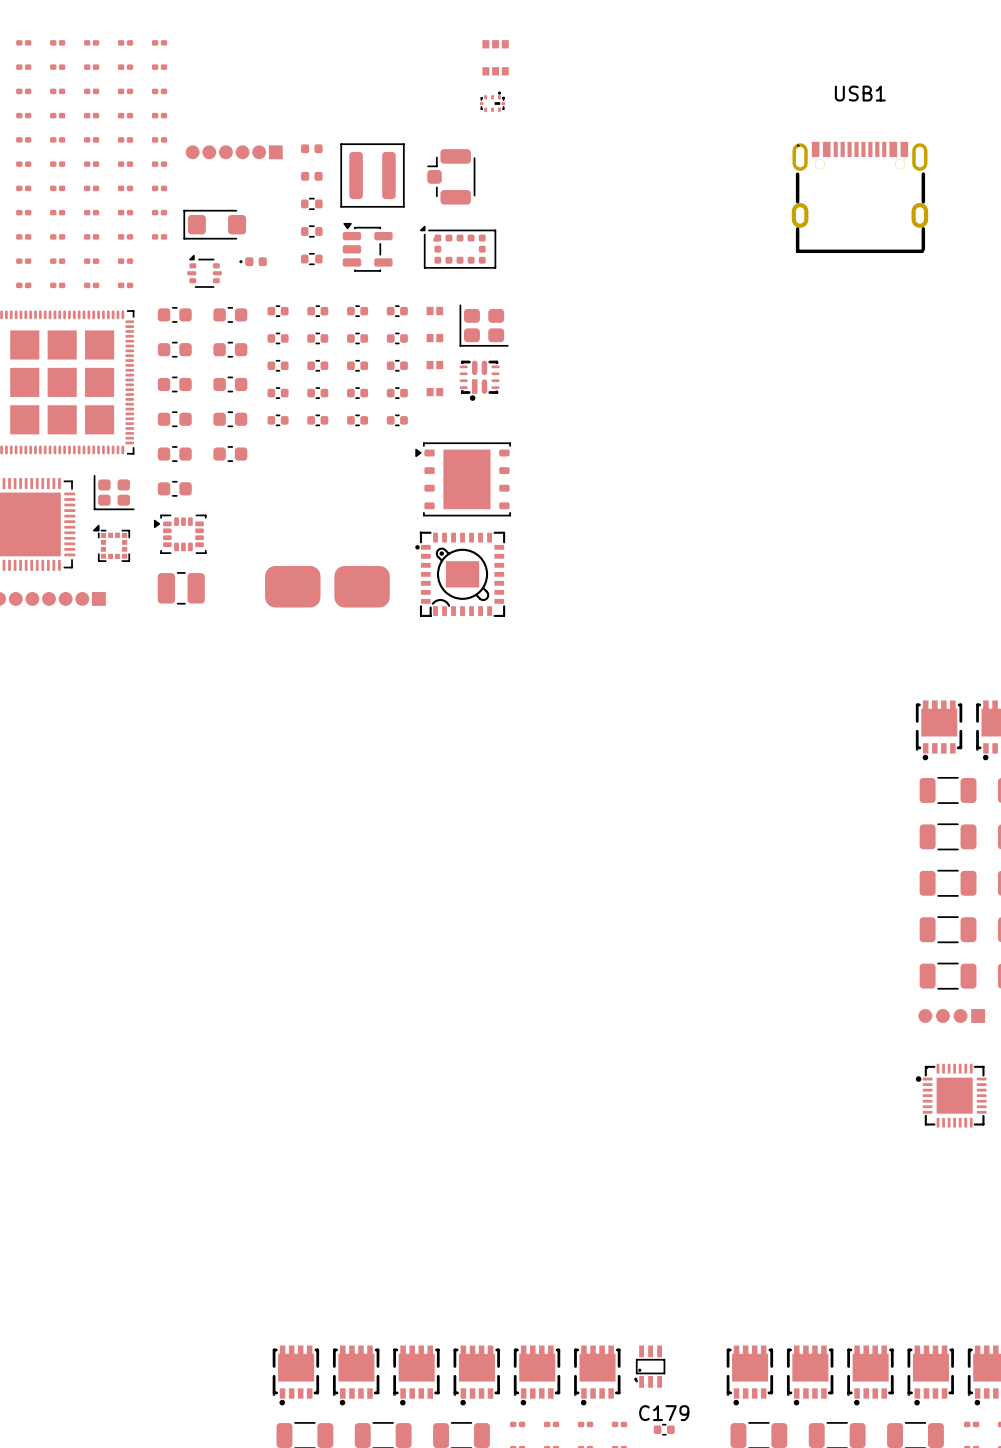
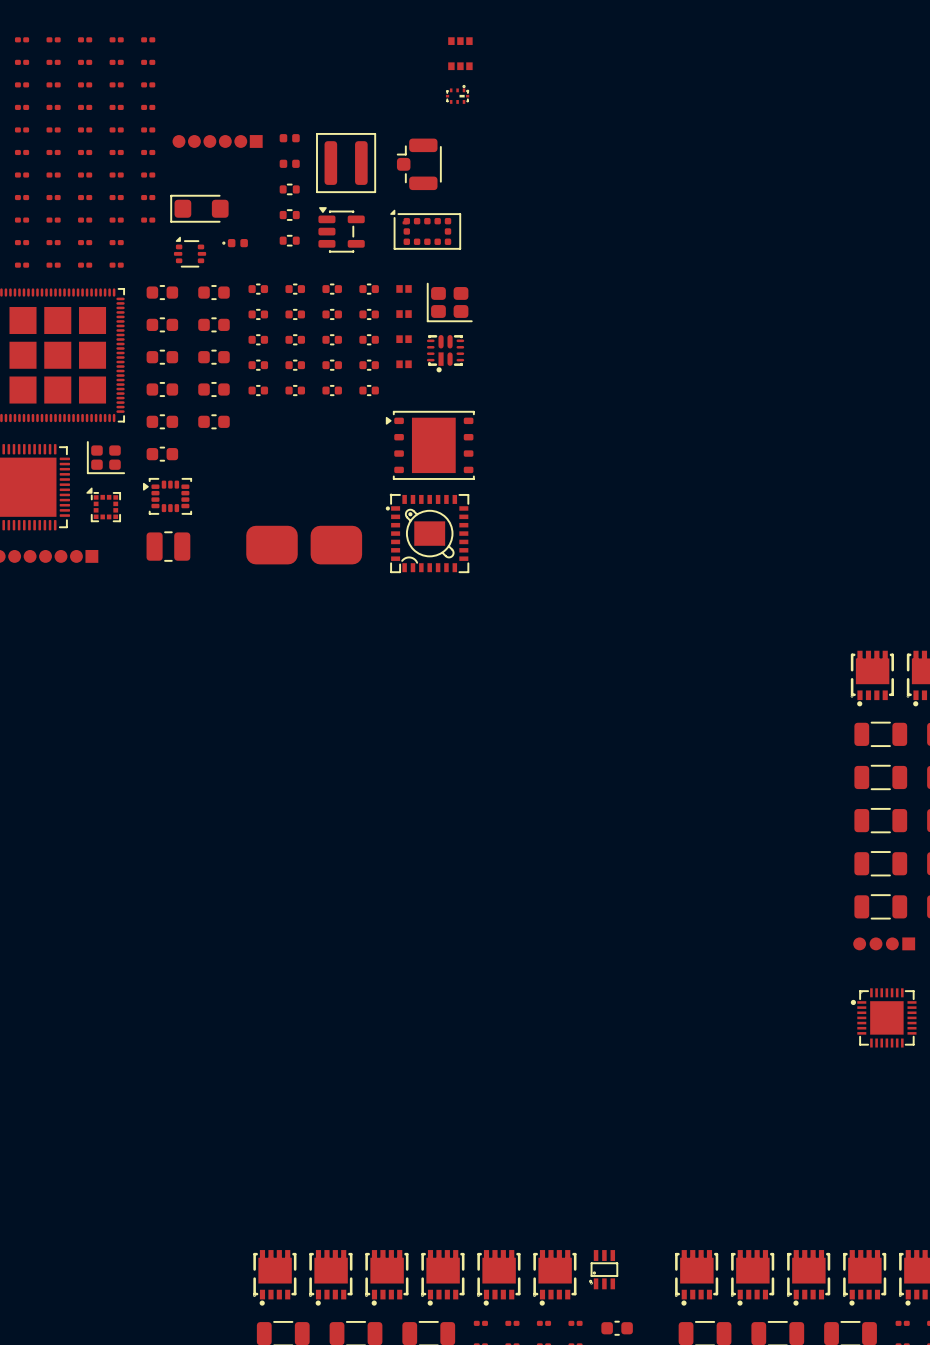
USB1: (859, 197) -> none
C179: (664, 1429) -> none
part: none -> (617, 1328)

